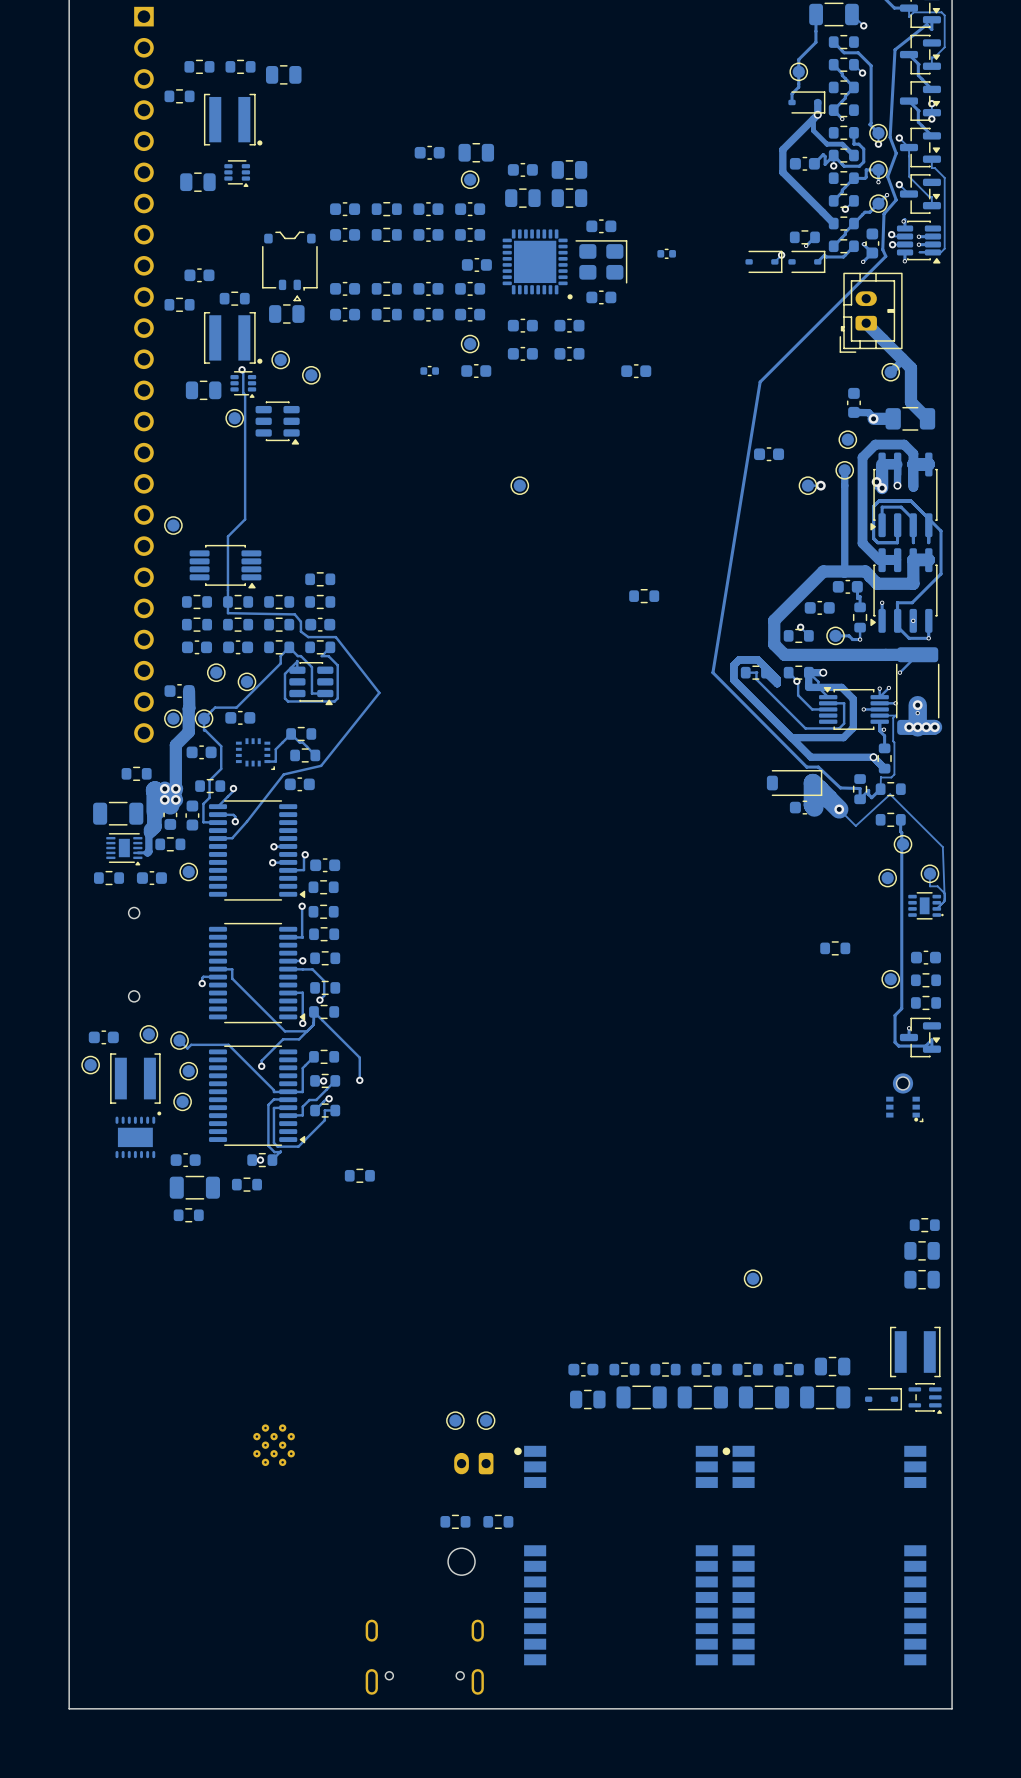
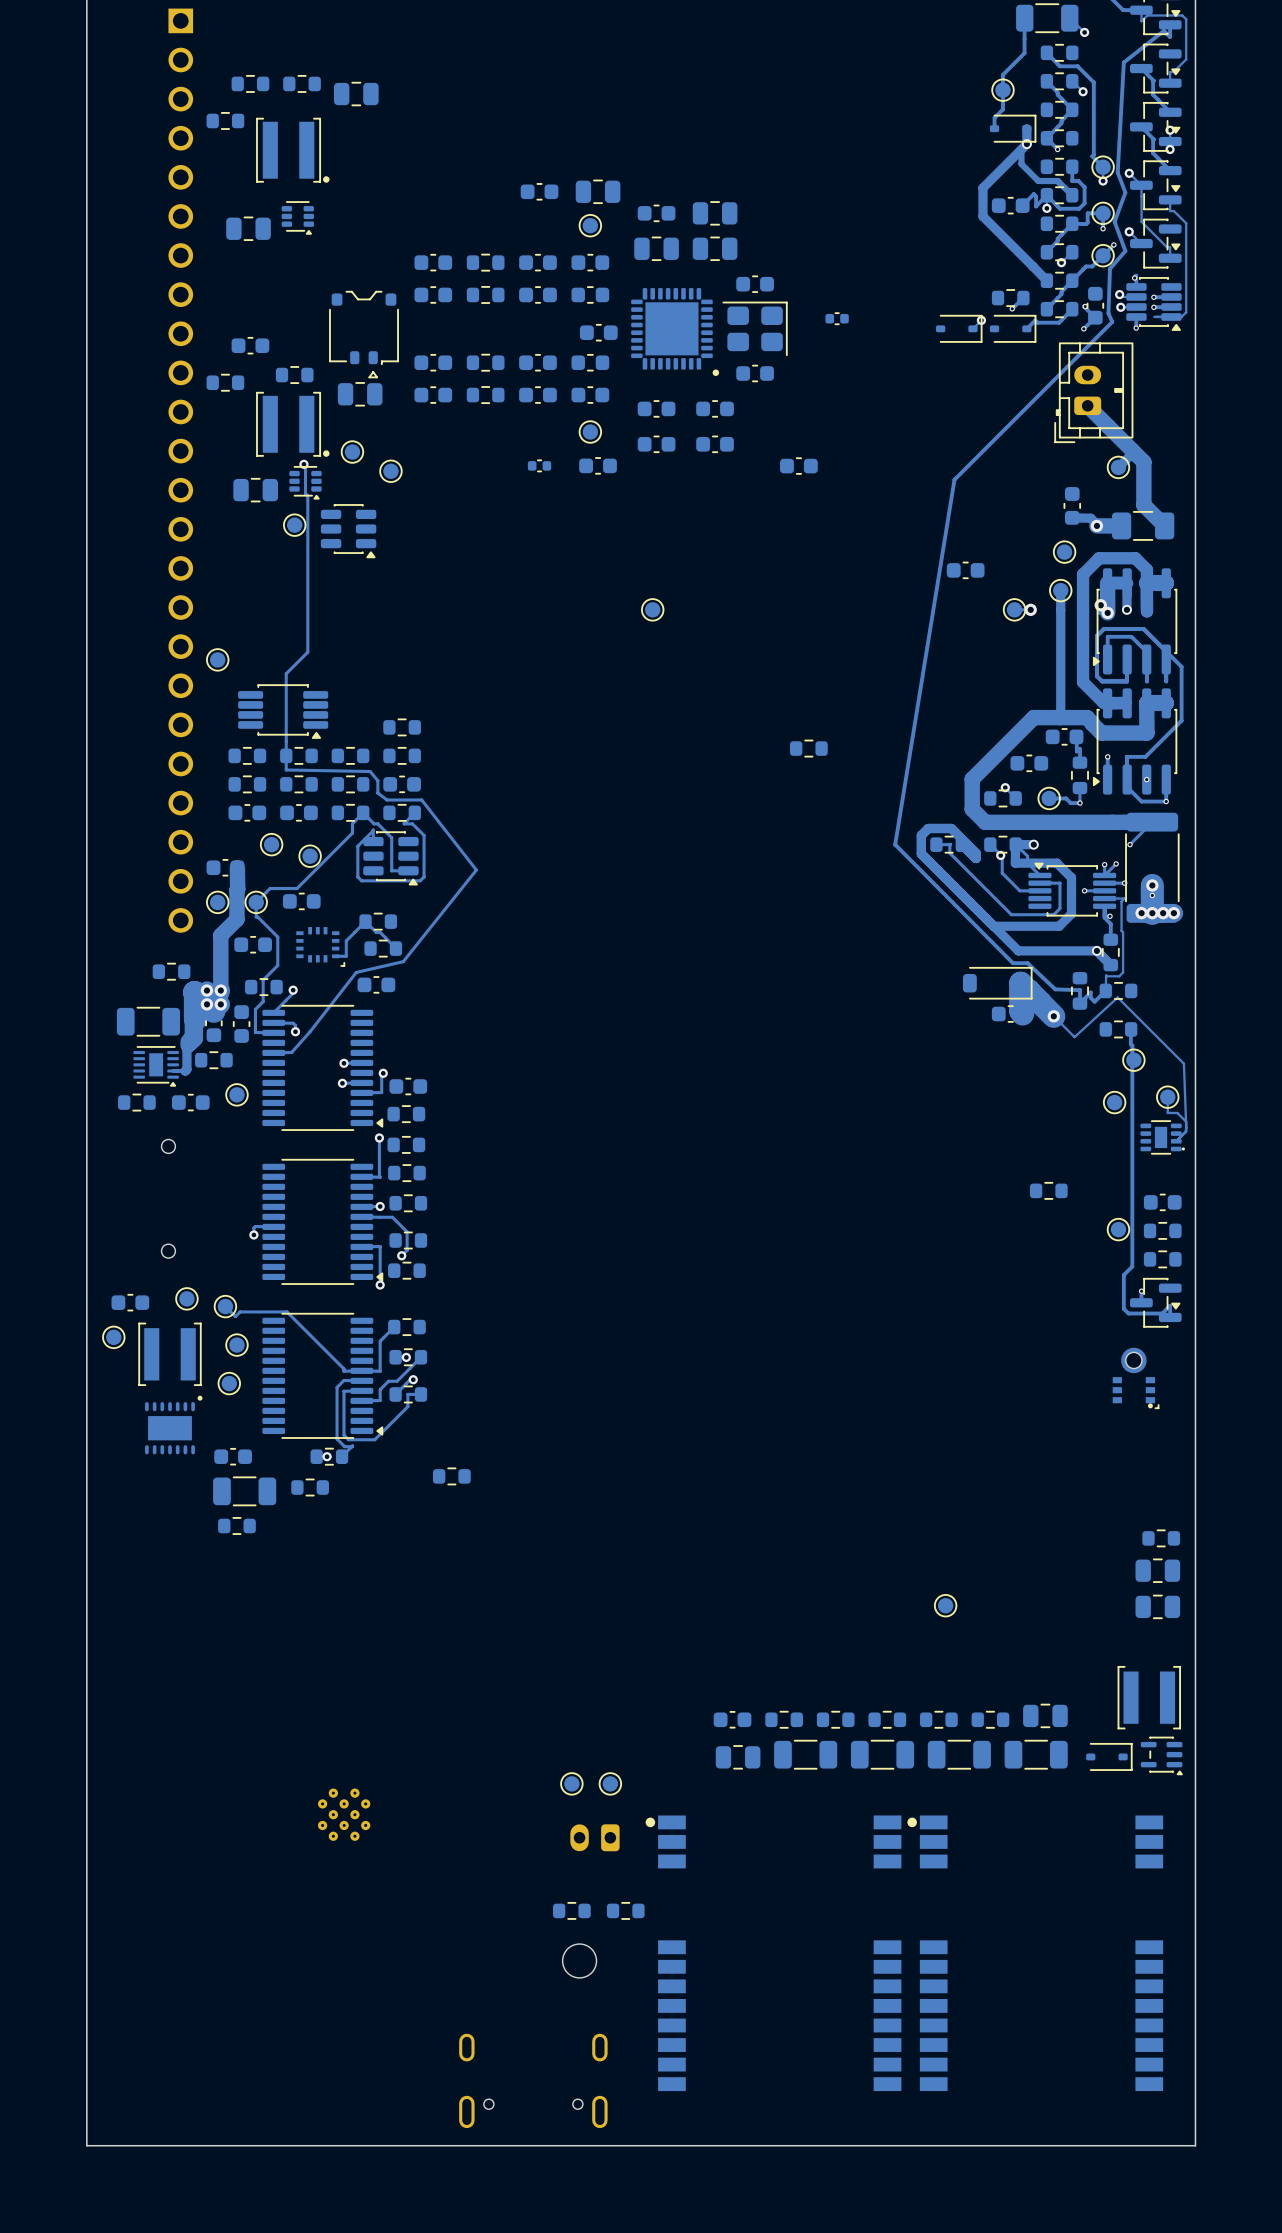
track: (218, 969) (232, 969) (232, 978) (284, 1031) (307, 1031) -> none
track: (261, 1066) (261, 1060) (283, 1039) (299, 1039) (313, 1024) (313, 1011) (359, 1057) (359, 1080) -> none
via: (261, 1066) -> none
via: (359, 1080) -> none

